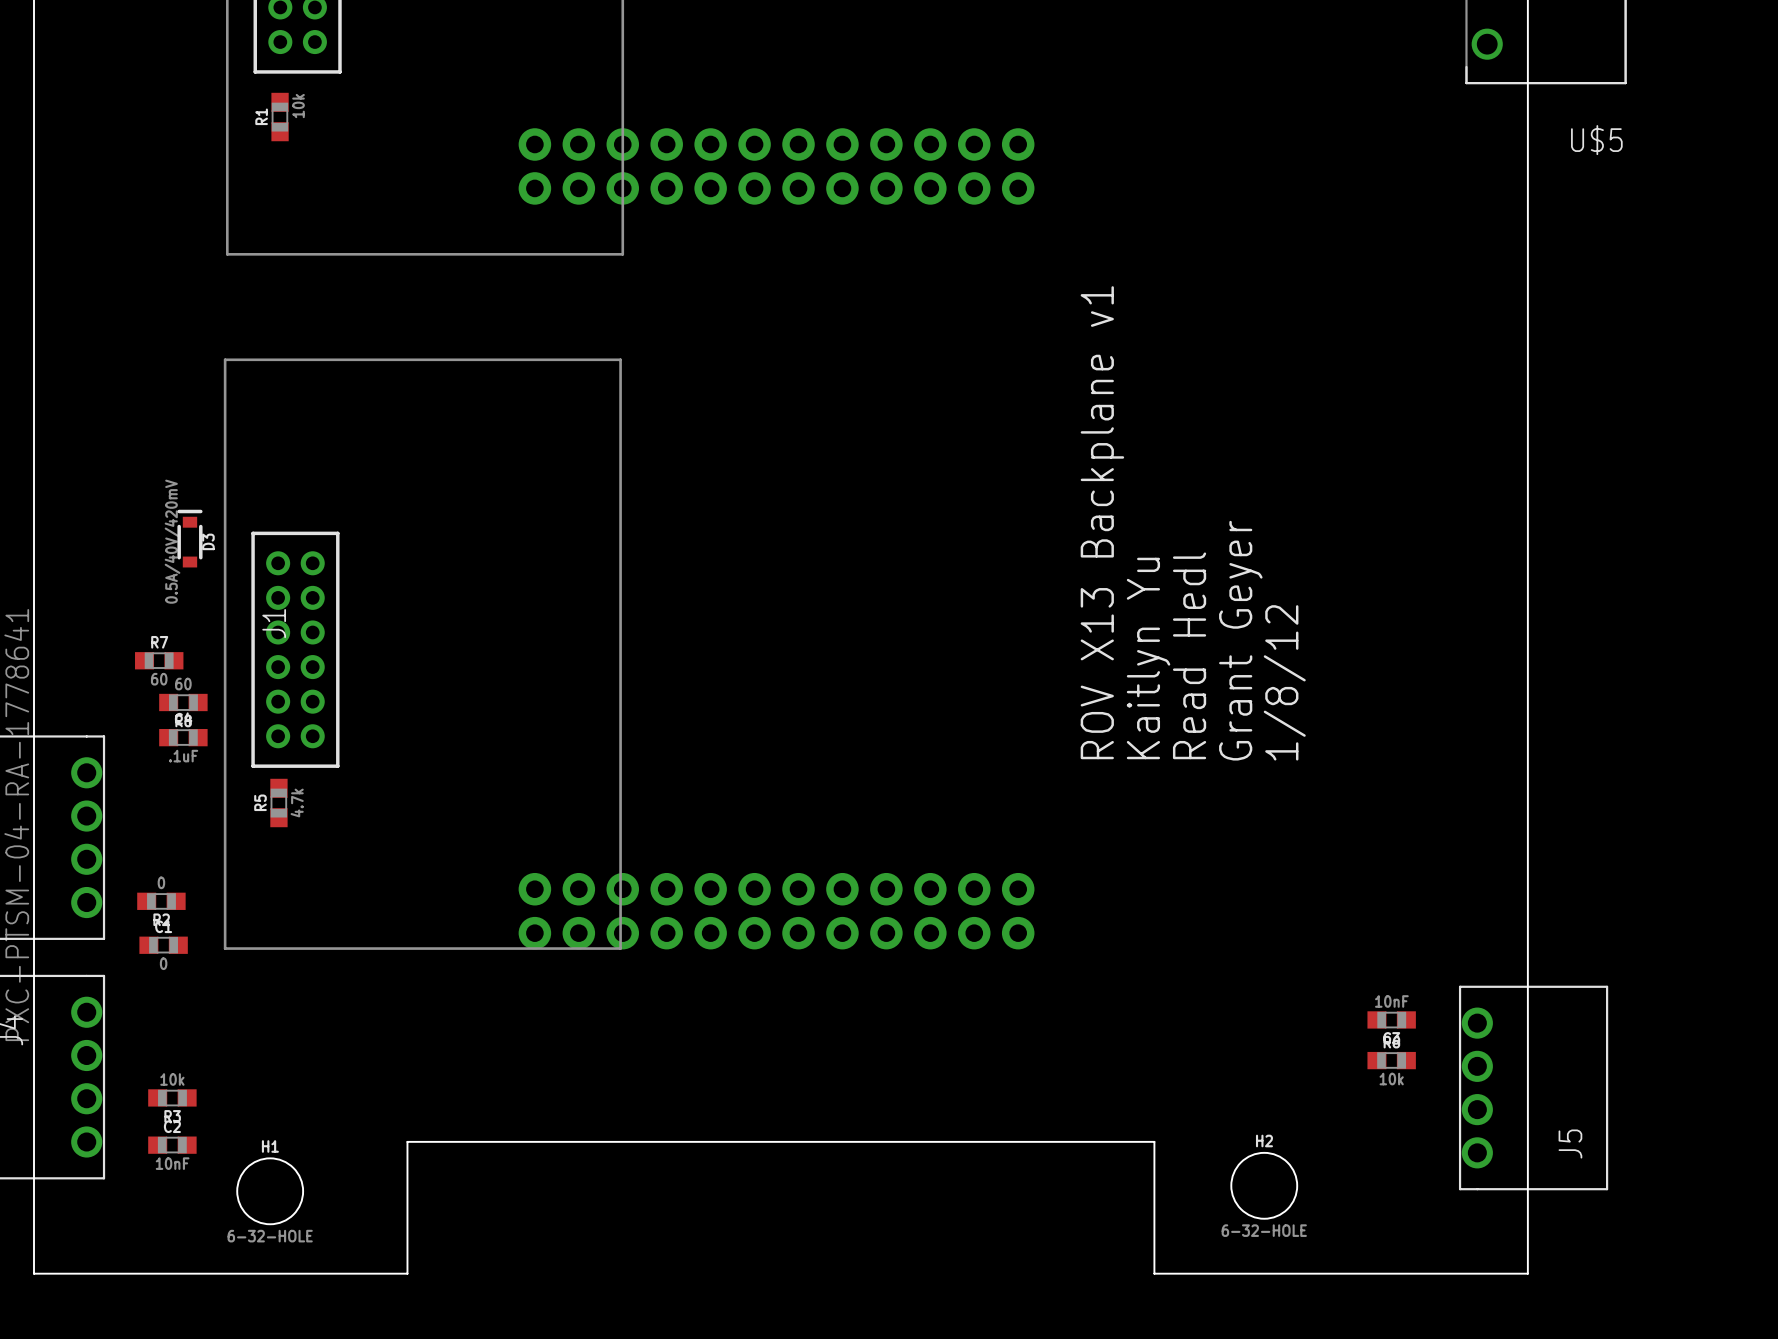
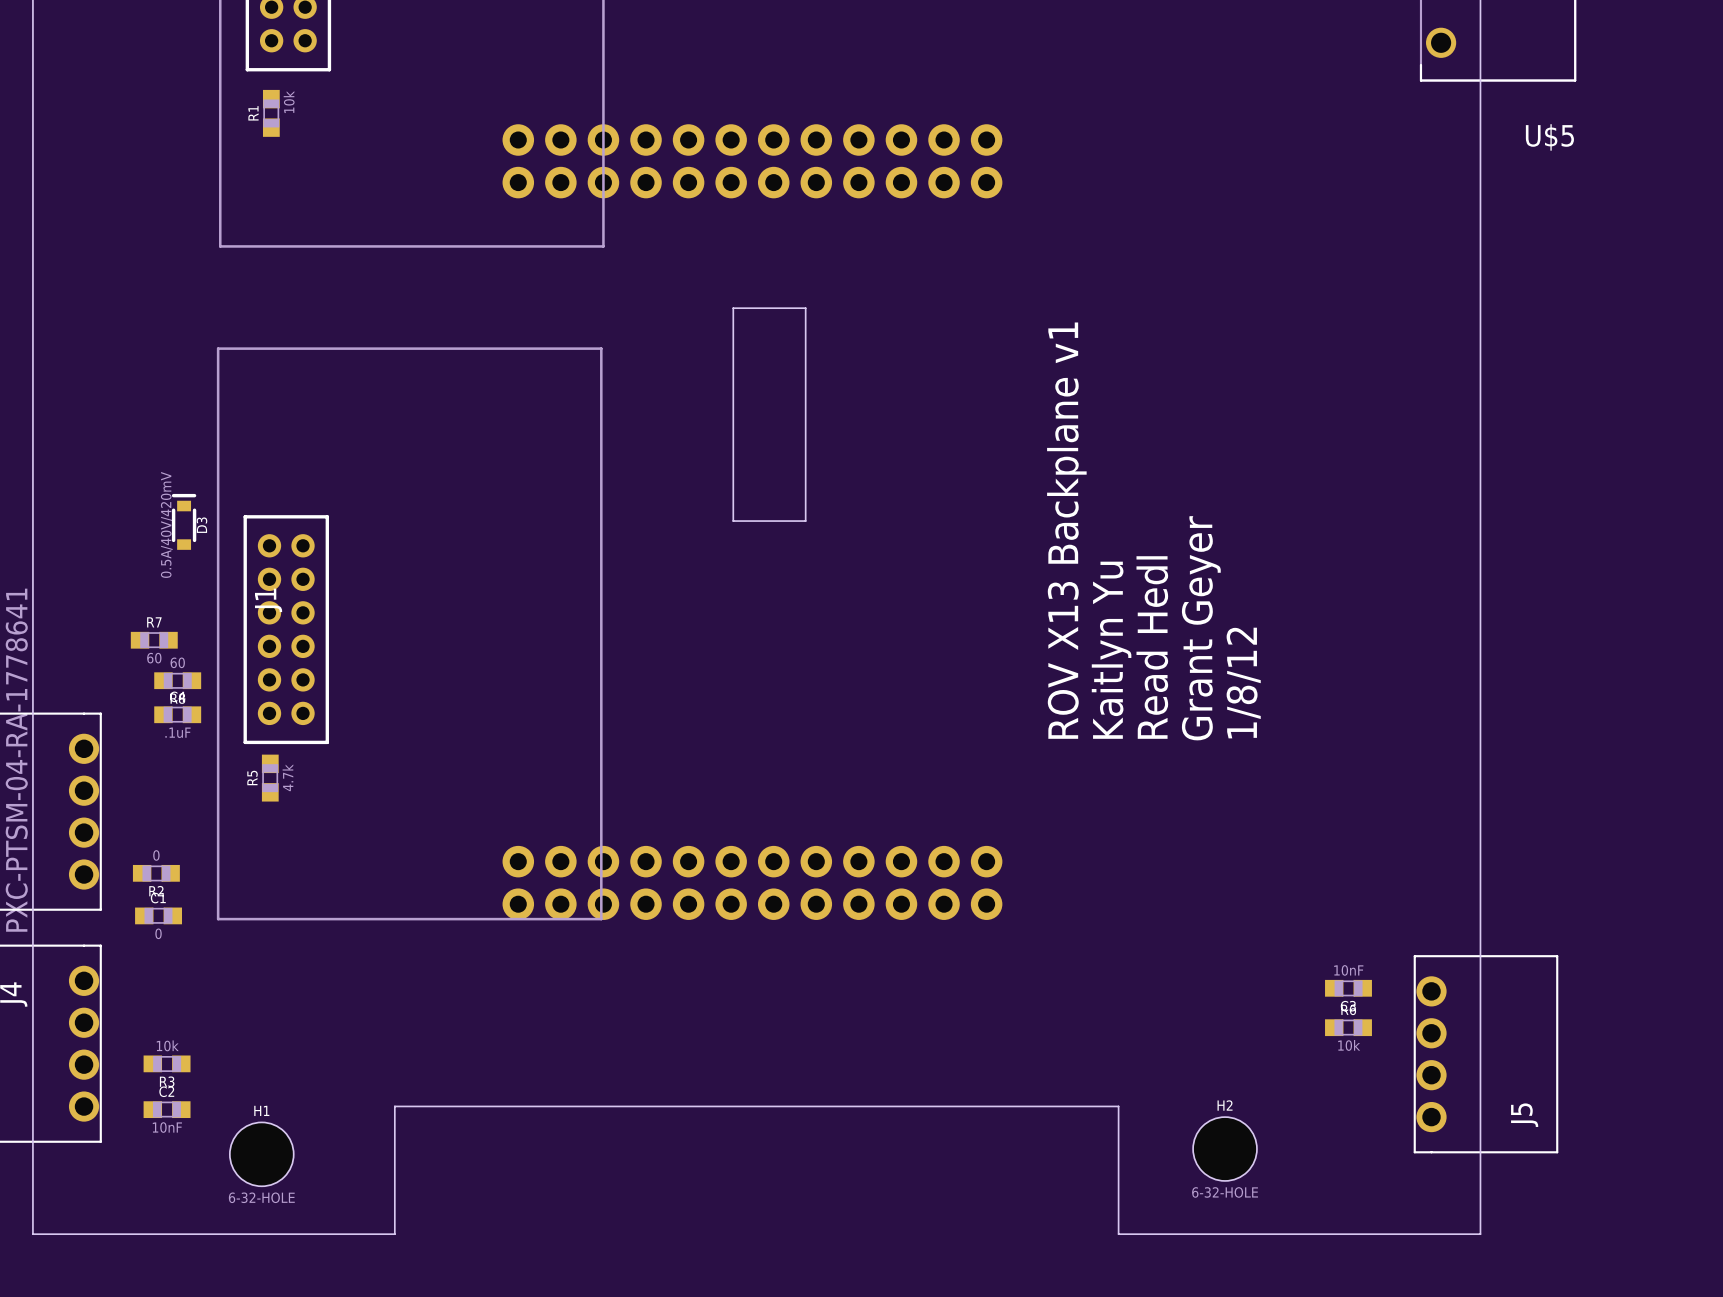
board edge: none -> (733, 308) (733, 521) (805, 521) (805, 308) (733, 308)

